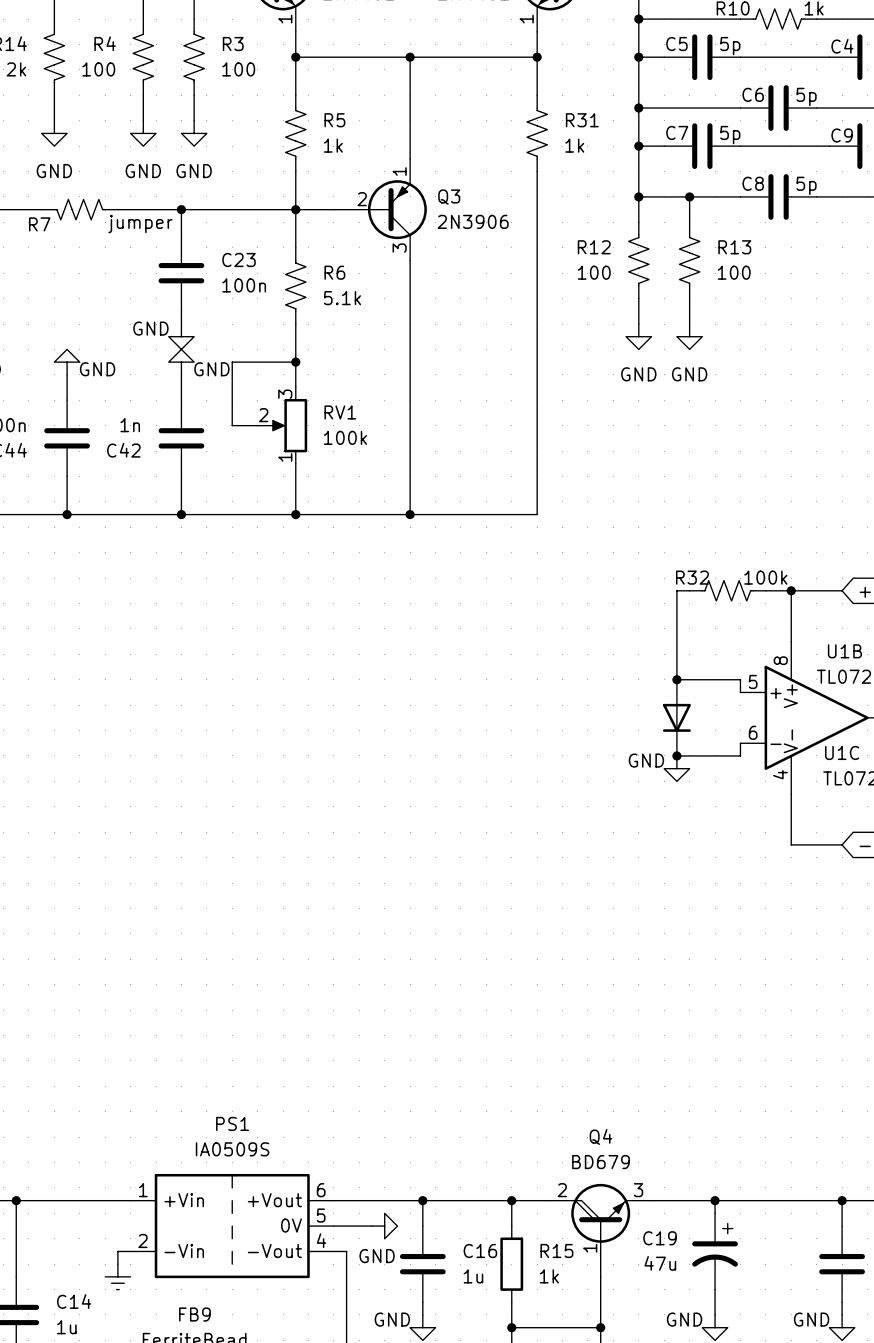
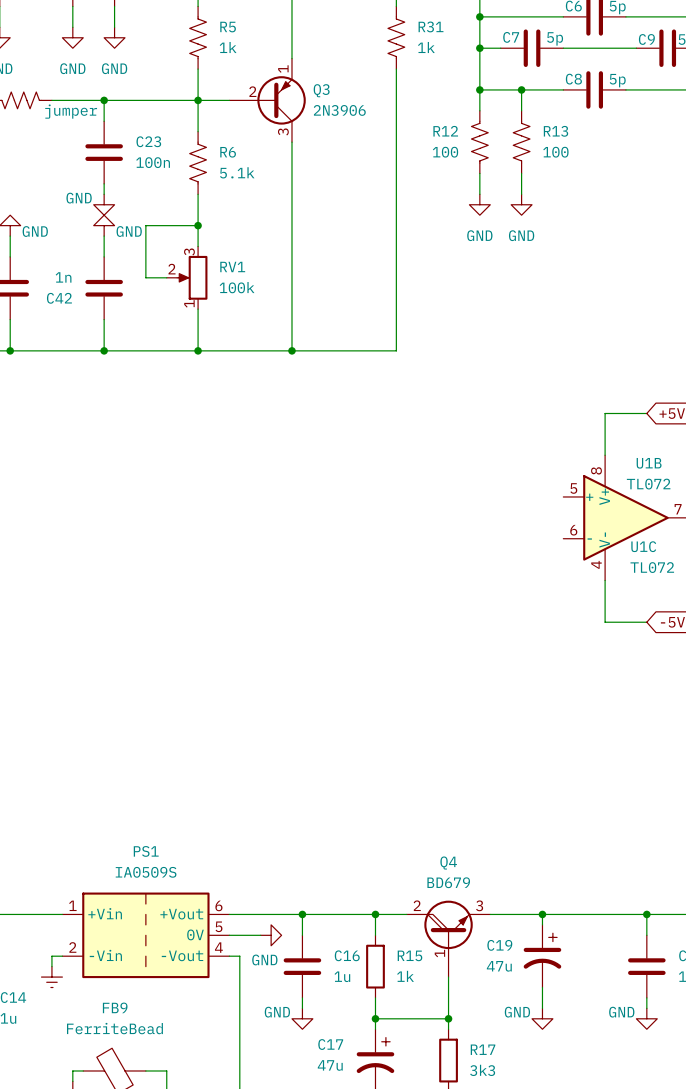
wire: (689, 590) (676, 590) (676, 679) (740, 679) (740, 692) -> none
R32: 100k (727, 590) -> none
wire: (765, 590) (791, 590) -> none
junction: (791, 590) -> none
junction: (676, 679) -> none
part: (676, 717) -> none
wire: (740, 743) (740, 755) (676, 755) -> none
junction: (676, 755) -> none
power symbol: GND (676, 768) -> none

